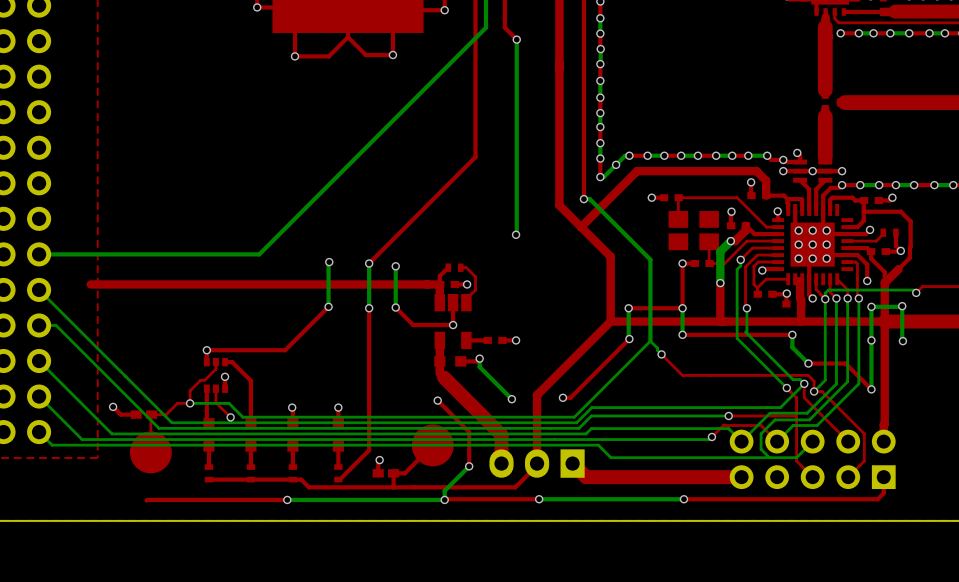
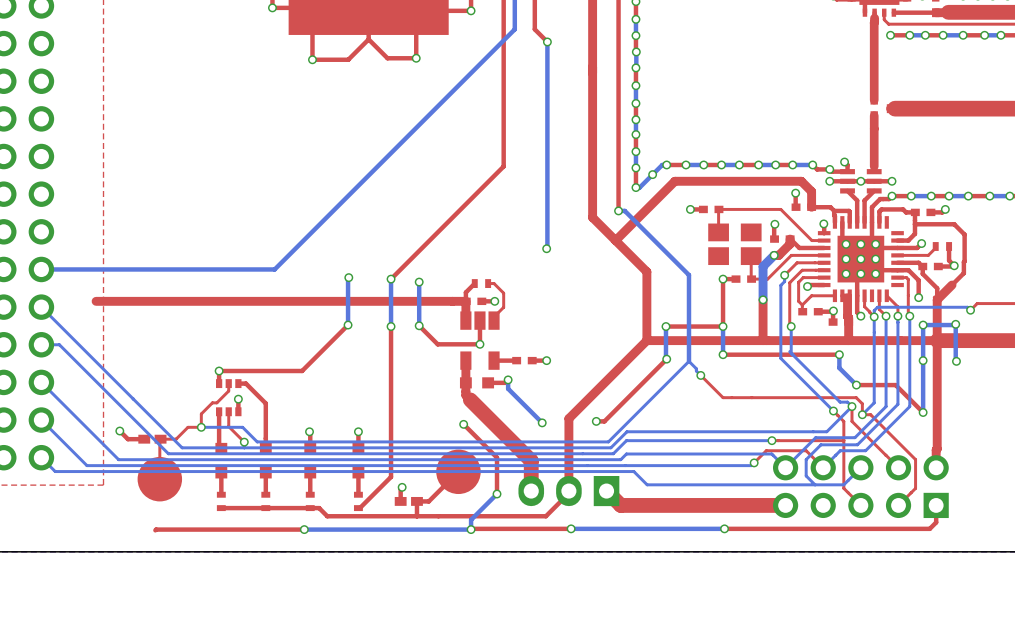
top track width: thick (825, 21) (825, 94) -> thin (874, 22) (874, 100)
top track width: thick (825, 109) (825, 157) -> thin (874, 115) (874, 166)

